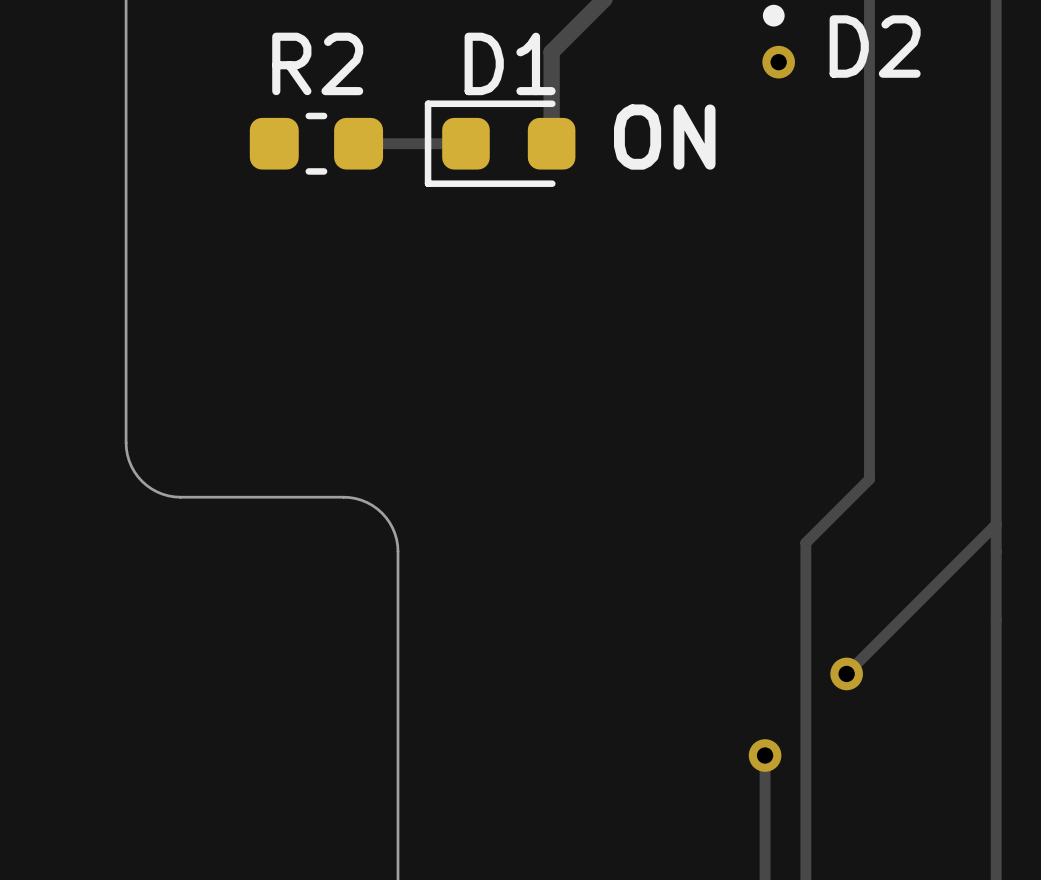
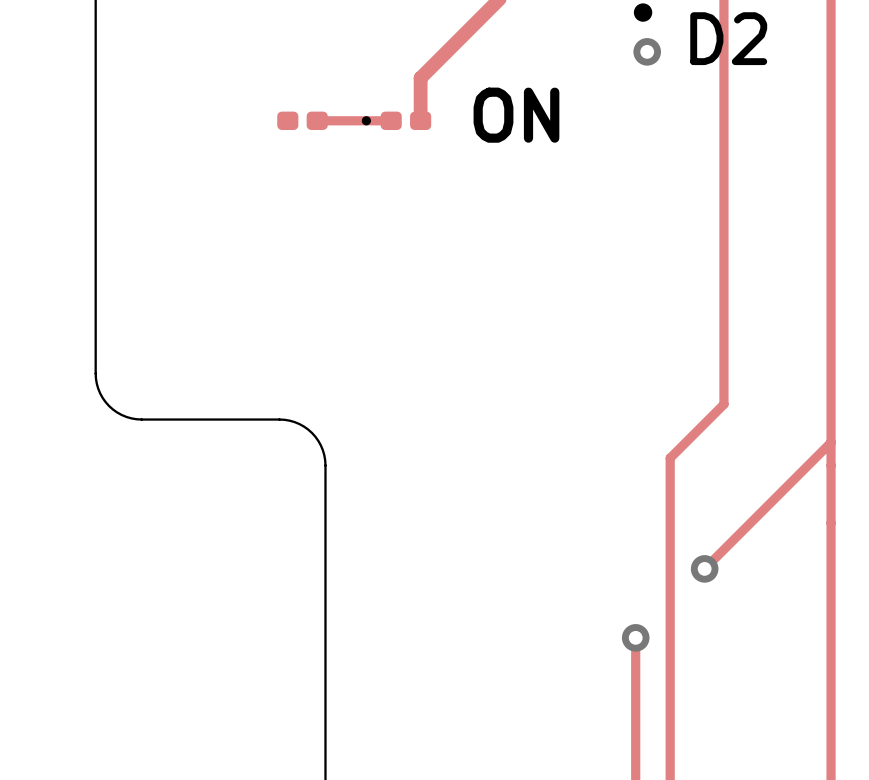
track: (551, 52) (551, 143) -> (455, 43) (420, 78) (420, 120)
text position: ON (664, 137) -> ON (516, 115)
R2: (316, 143) -> none
part: none -> (302, 120)
part: none -> (396, 120)
D1: (500, 143) -> none

